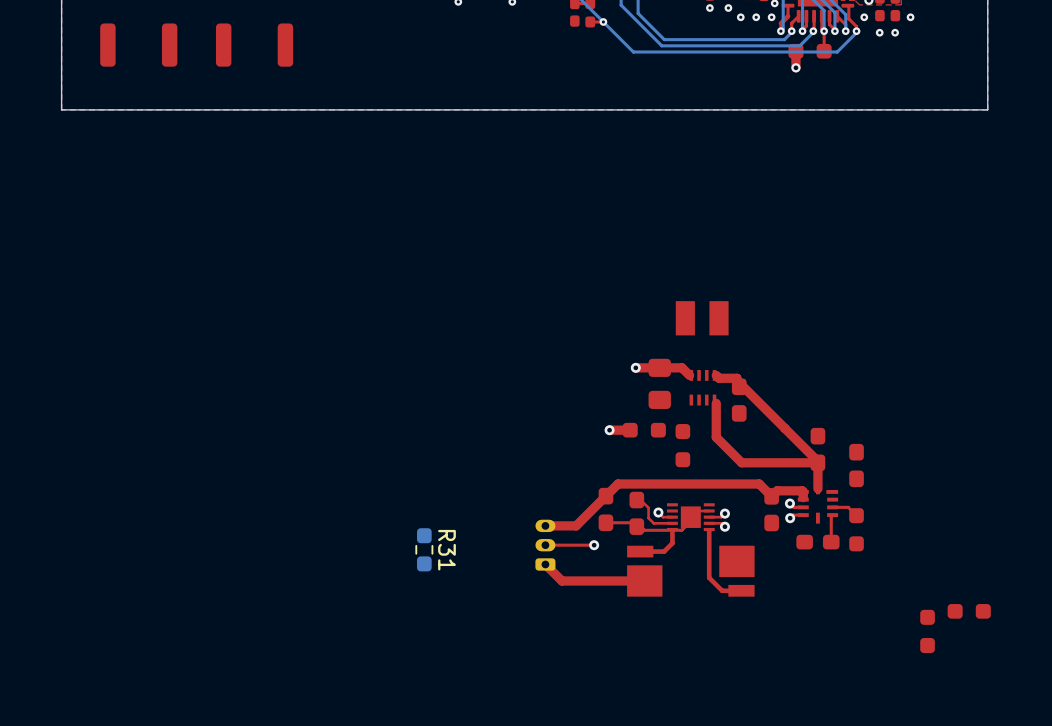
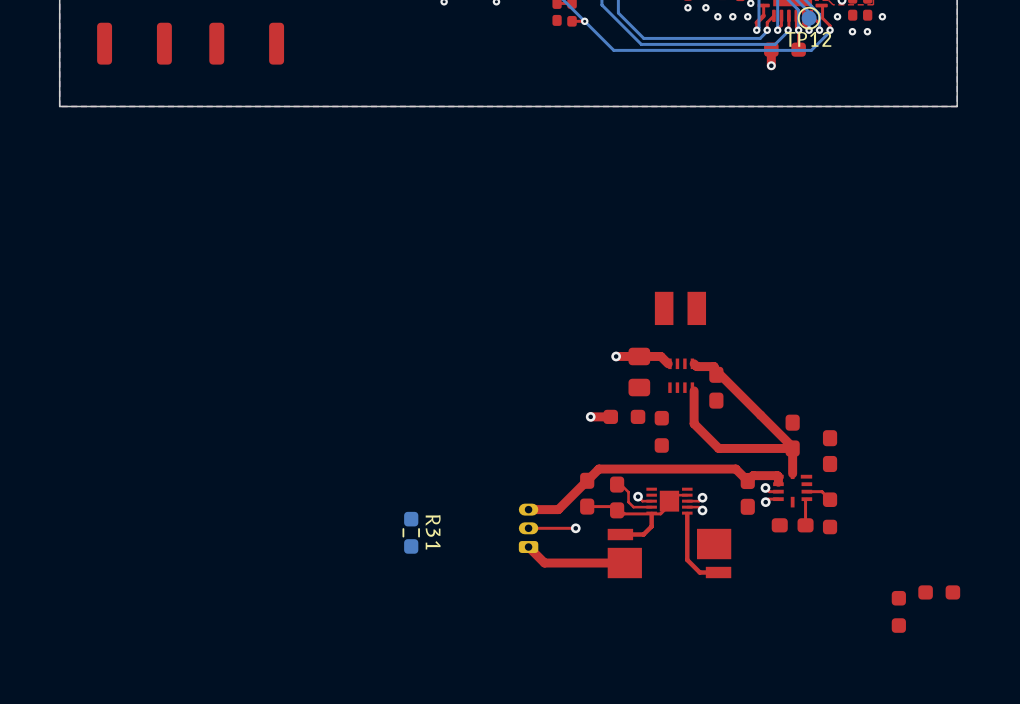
TP12: none -> (809, 18)

